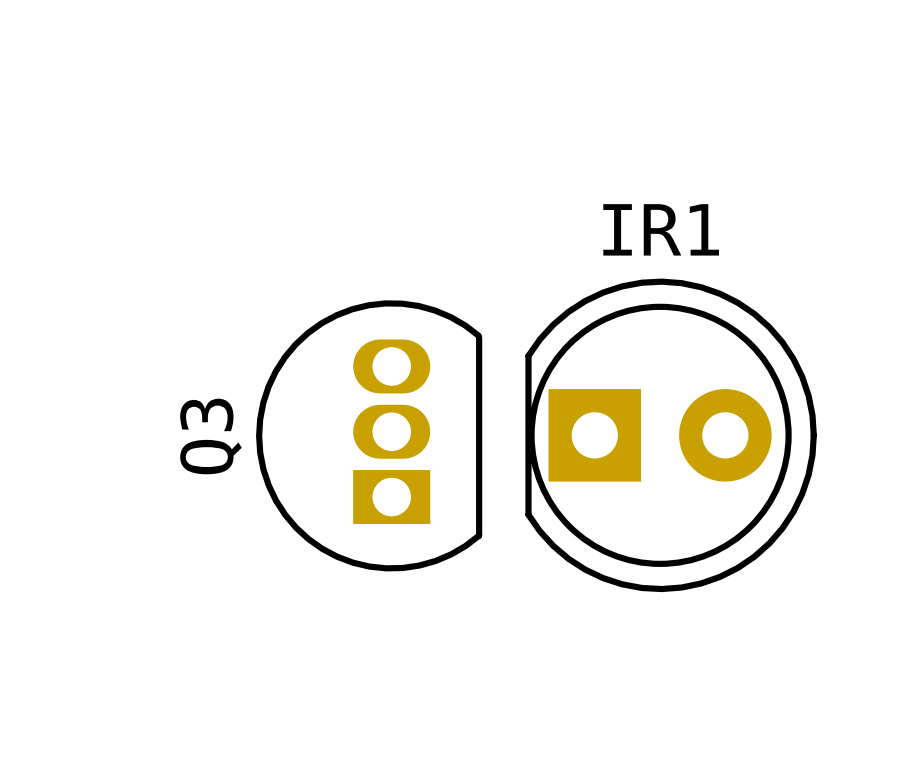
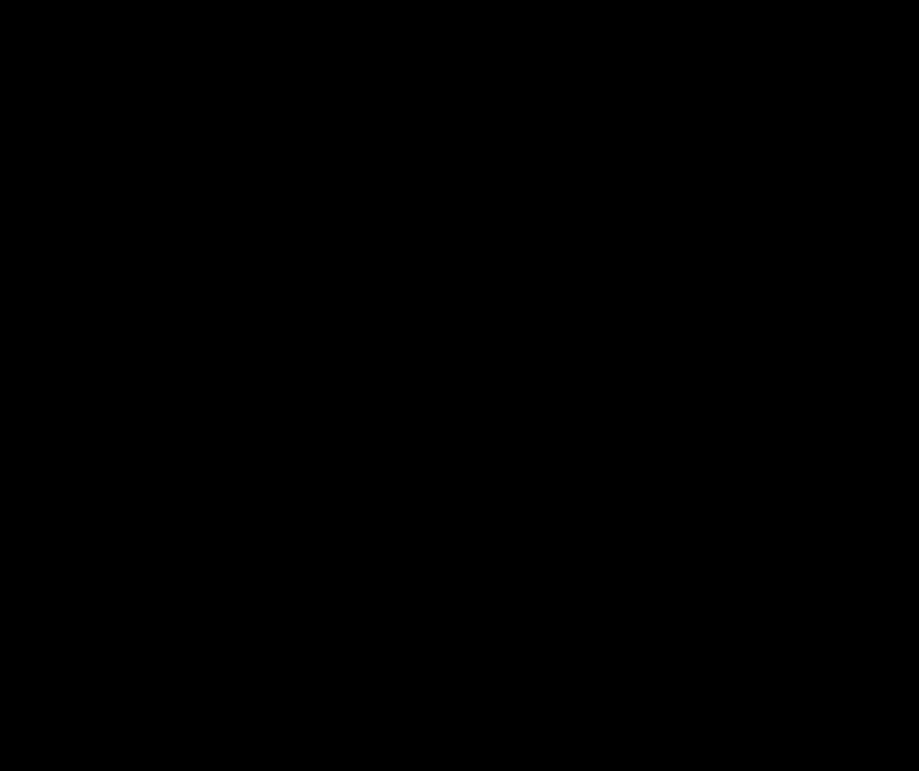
Q3: (369, 435) -> none
IR1: (671, 435) -> none

